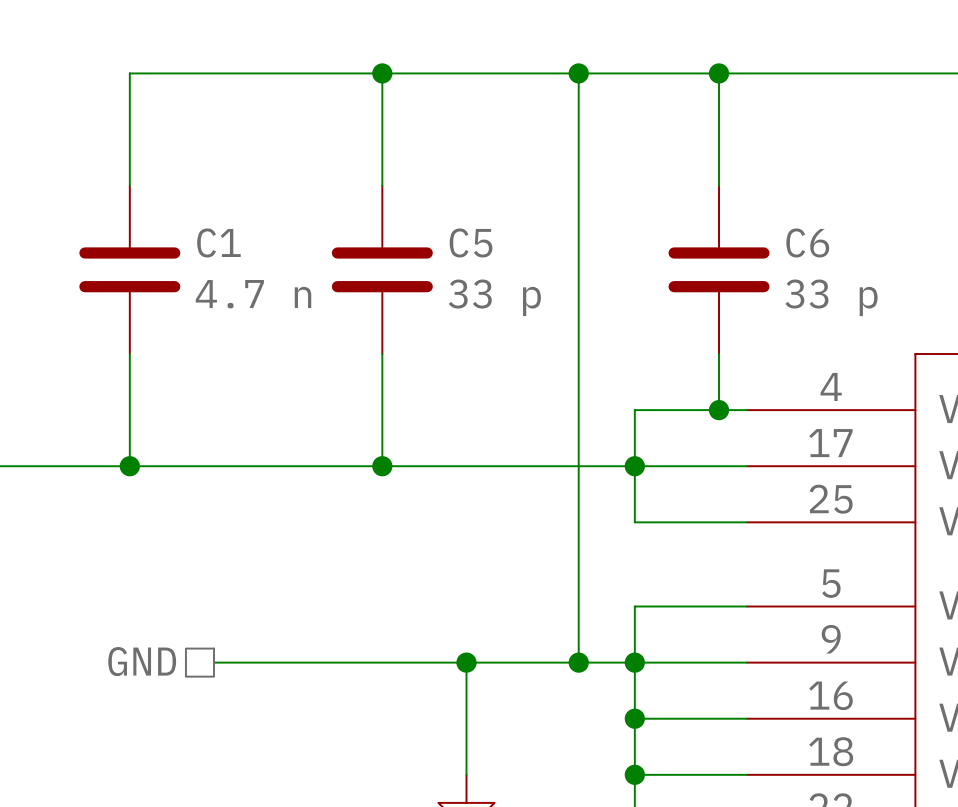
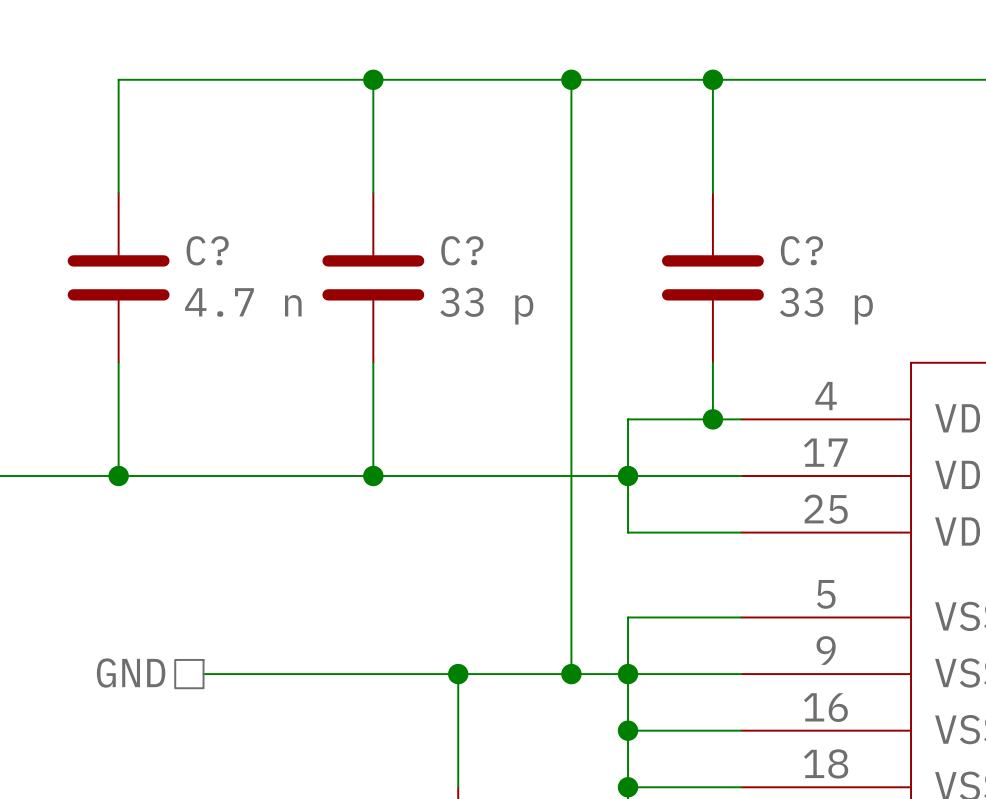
C1 name: C1 (218, 242) -> C? (207, 250)
C5 name: C5 (471, 242) -> C? (462, 250)
C6 name: C6 (807, 242) -> C? (801, 250)

